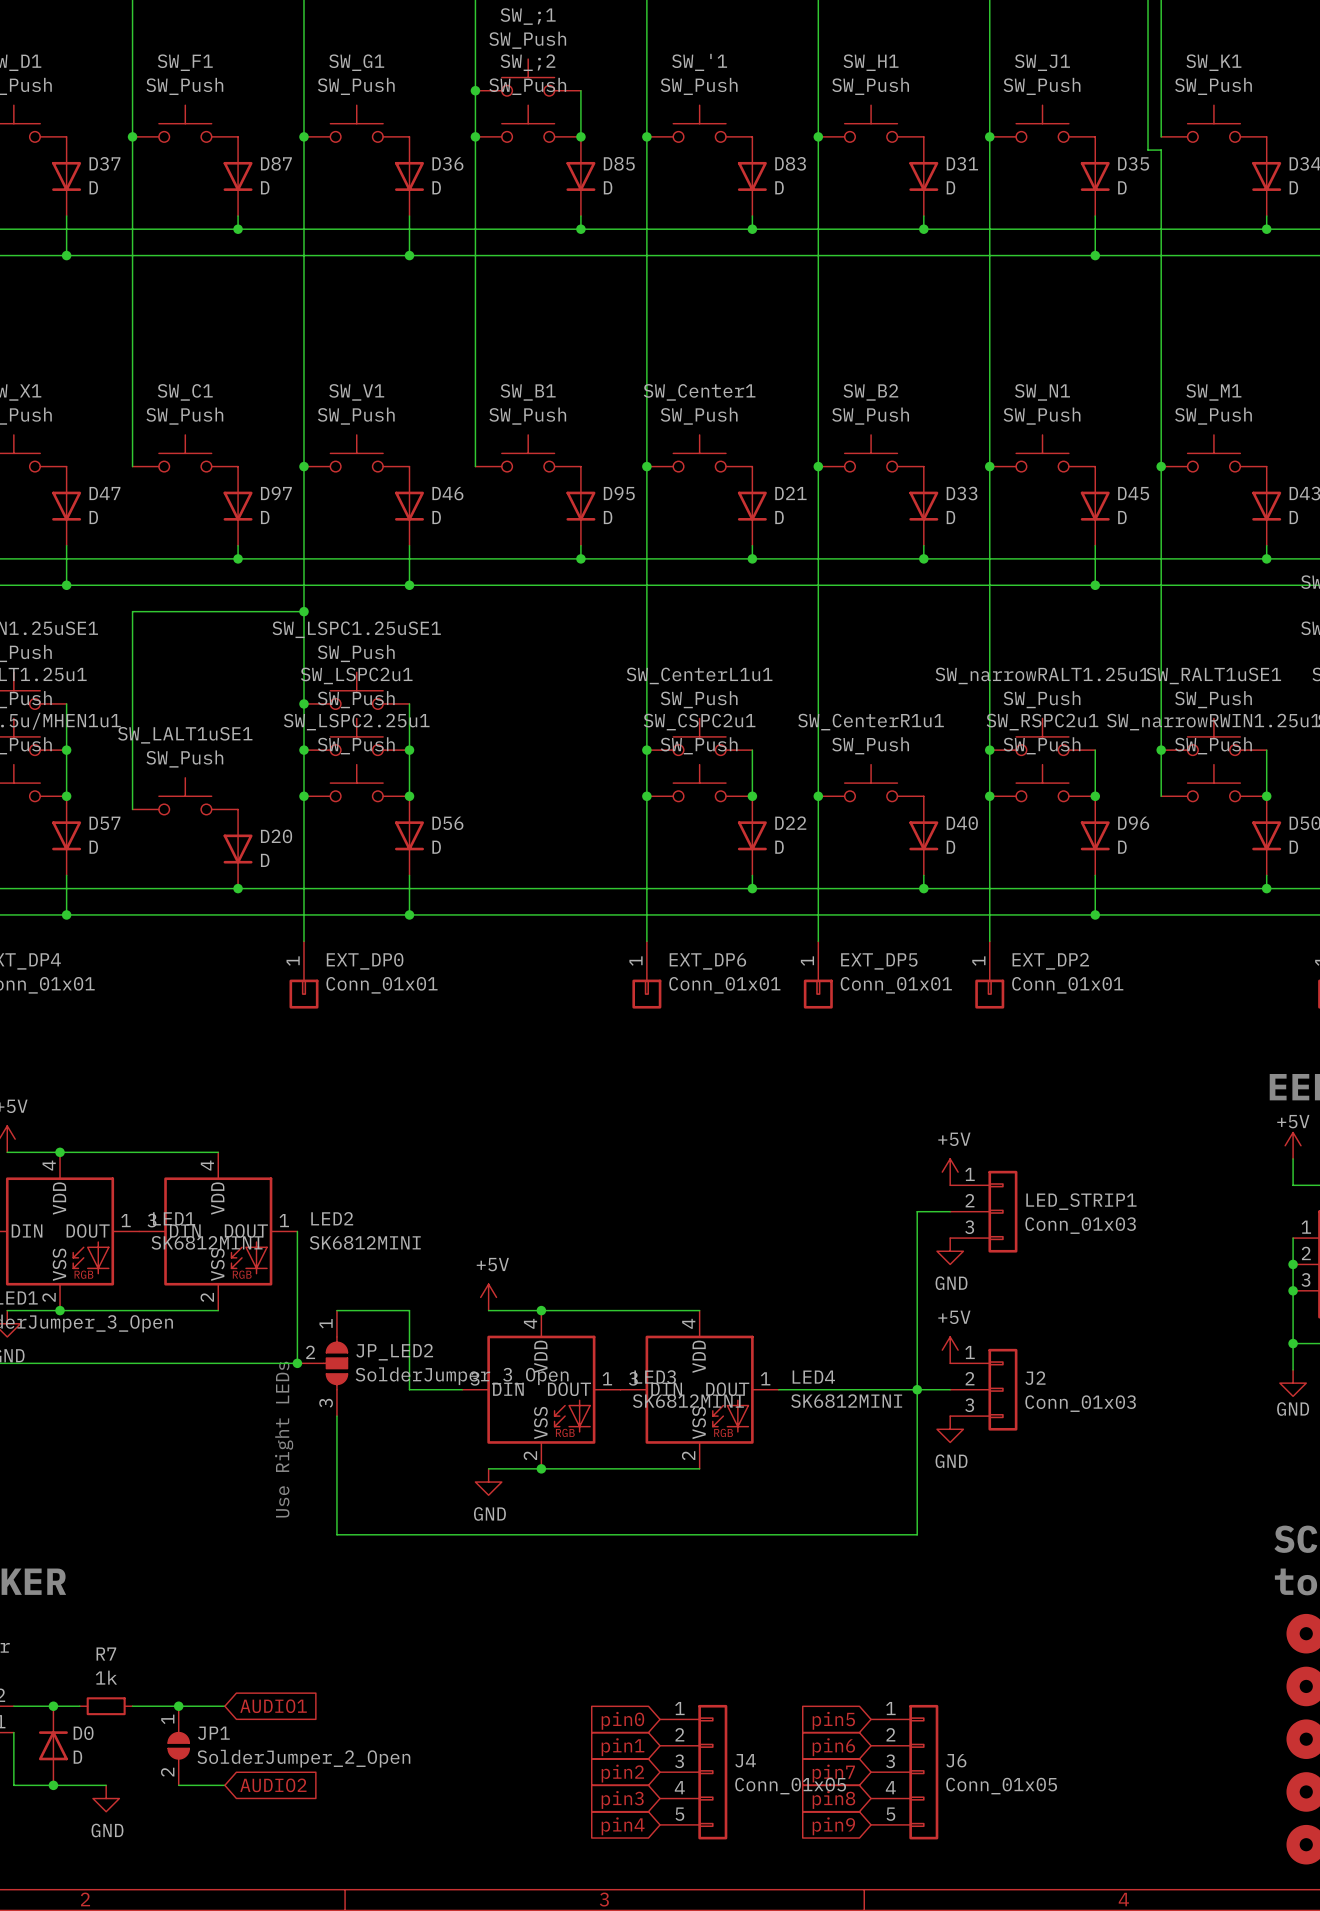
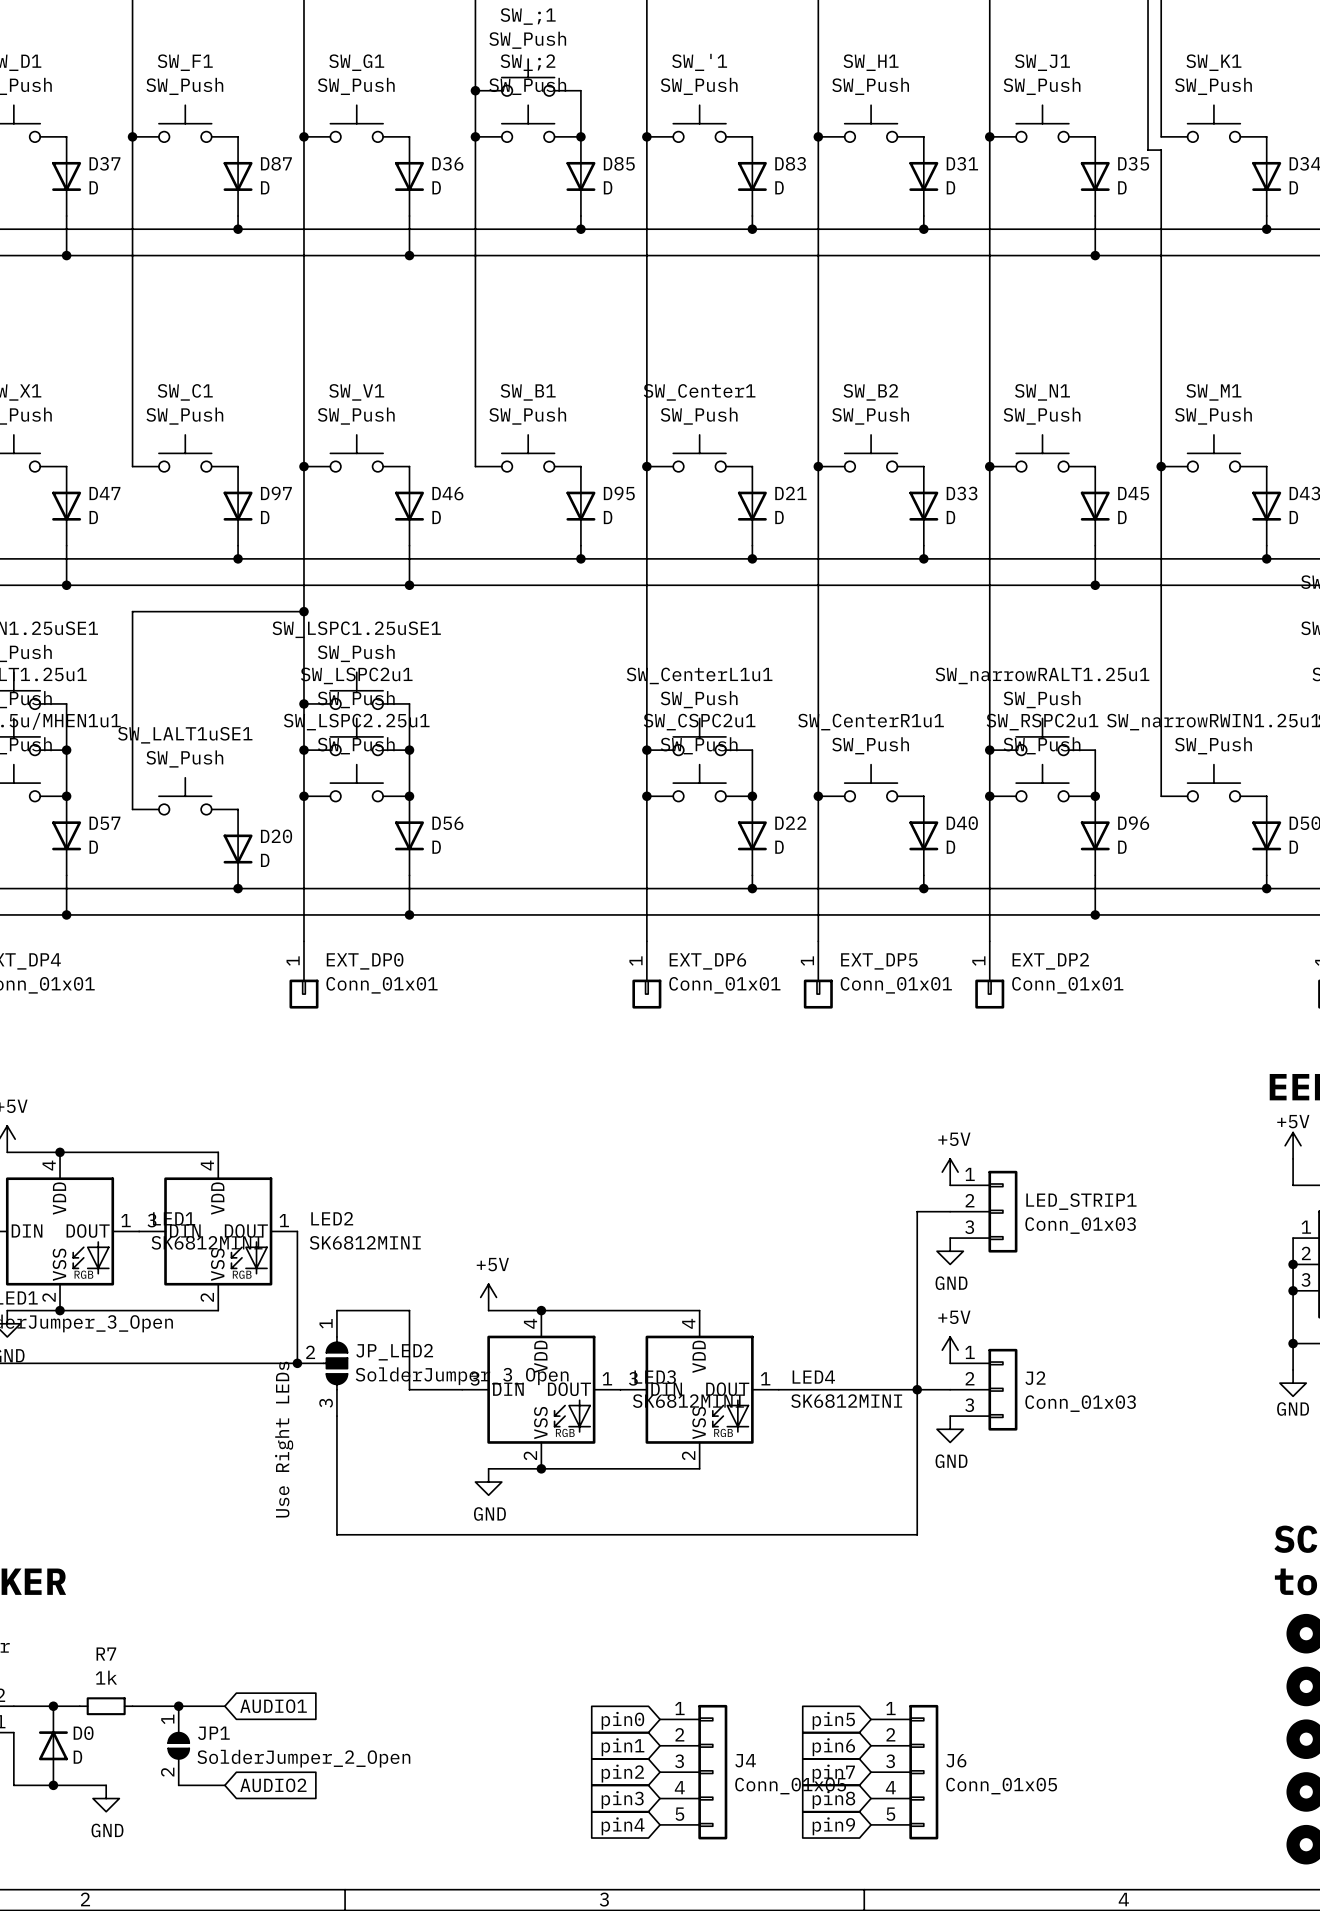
SW_RALT1uSE1: SW_Push (1213, 736) -> none
junction: (1161, 750) -> none
wire: (1266, 750) (1266, 796) -> none
junction: (1266, 796) -> none

